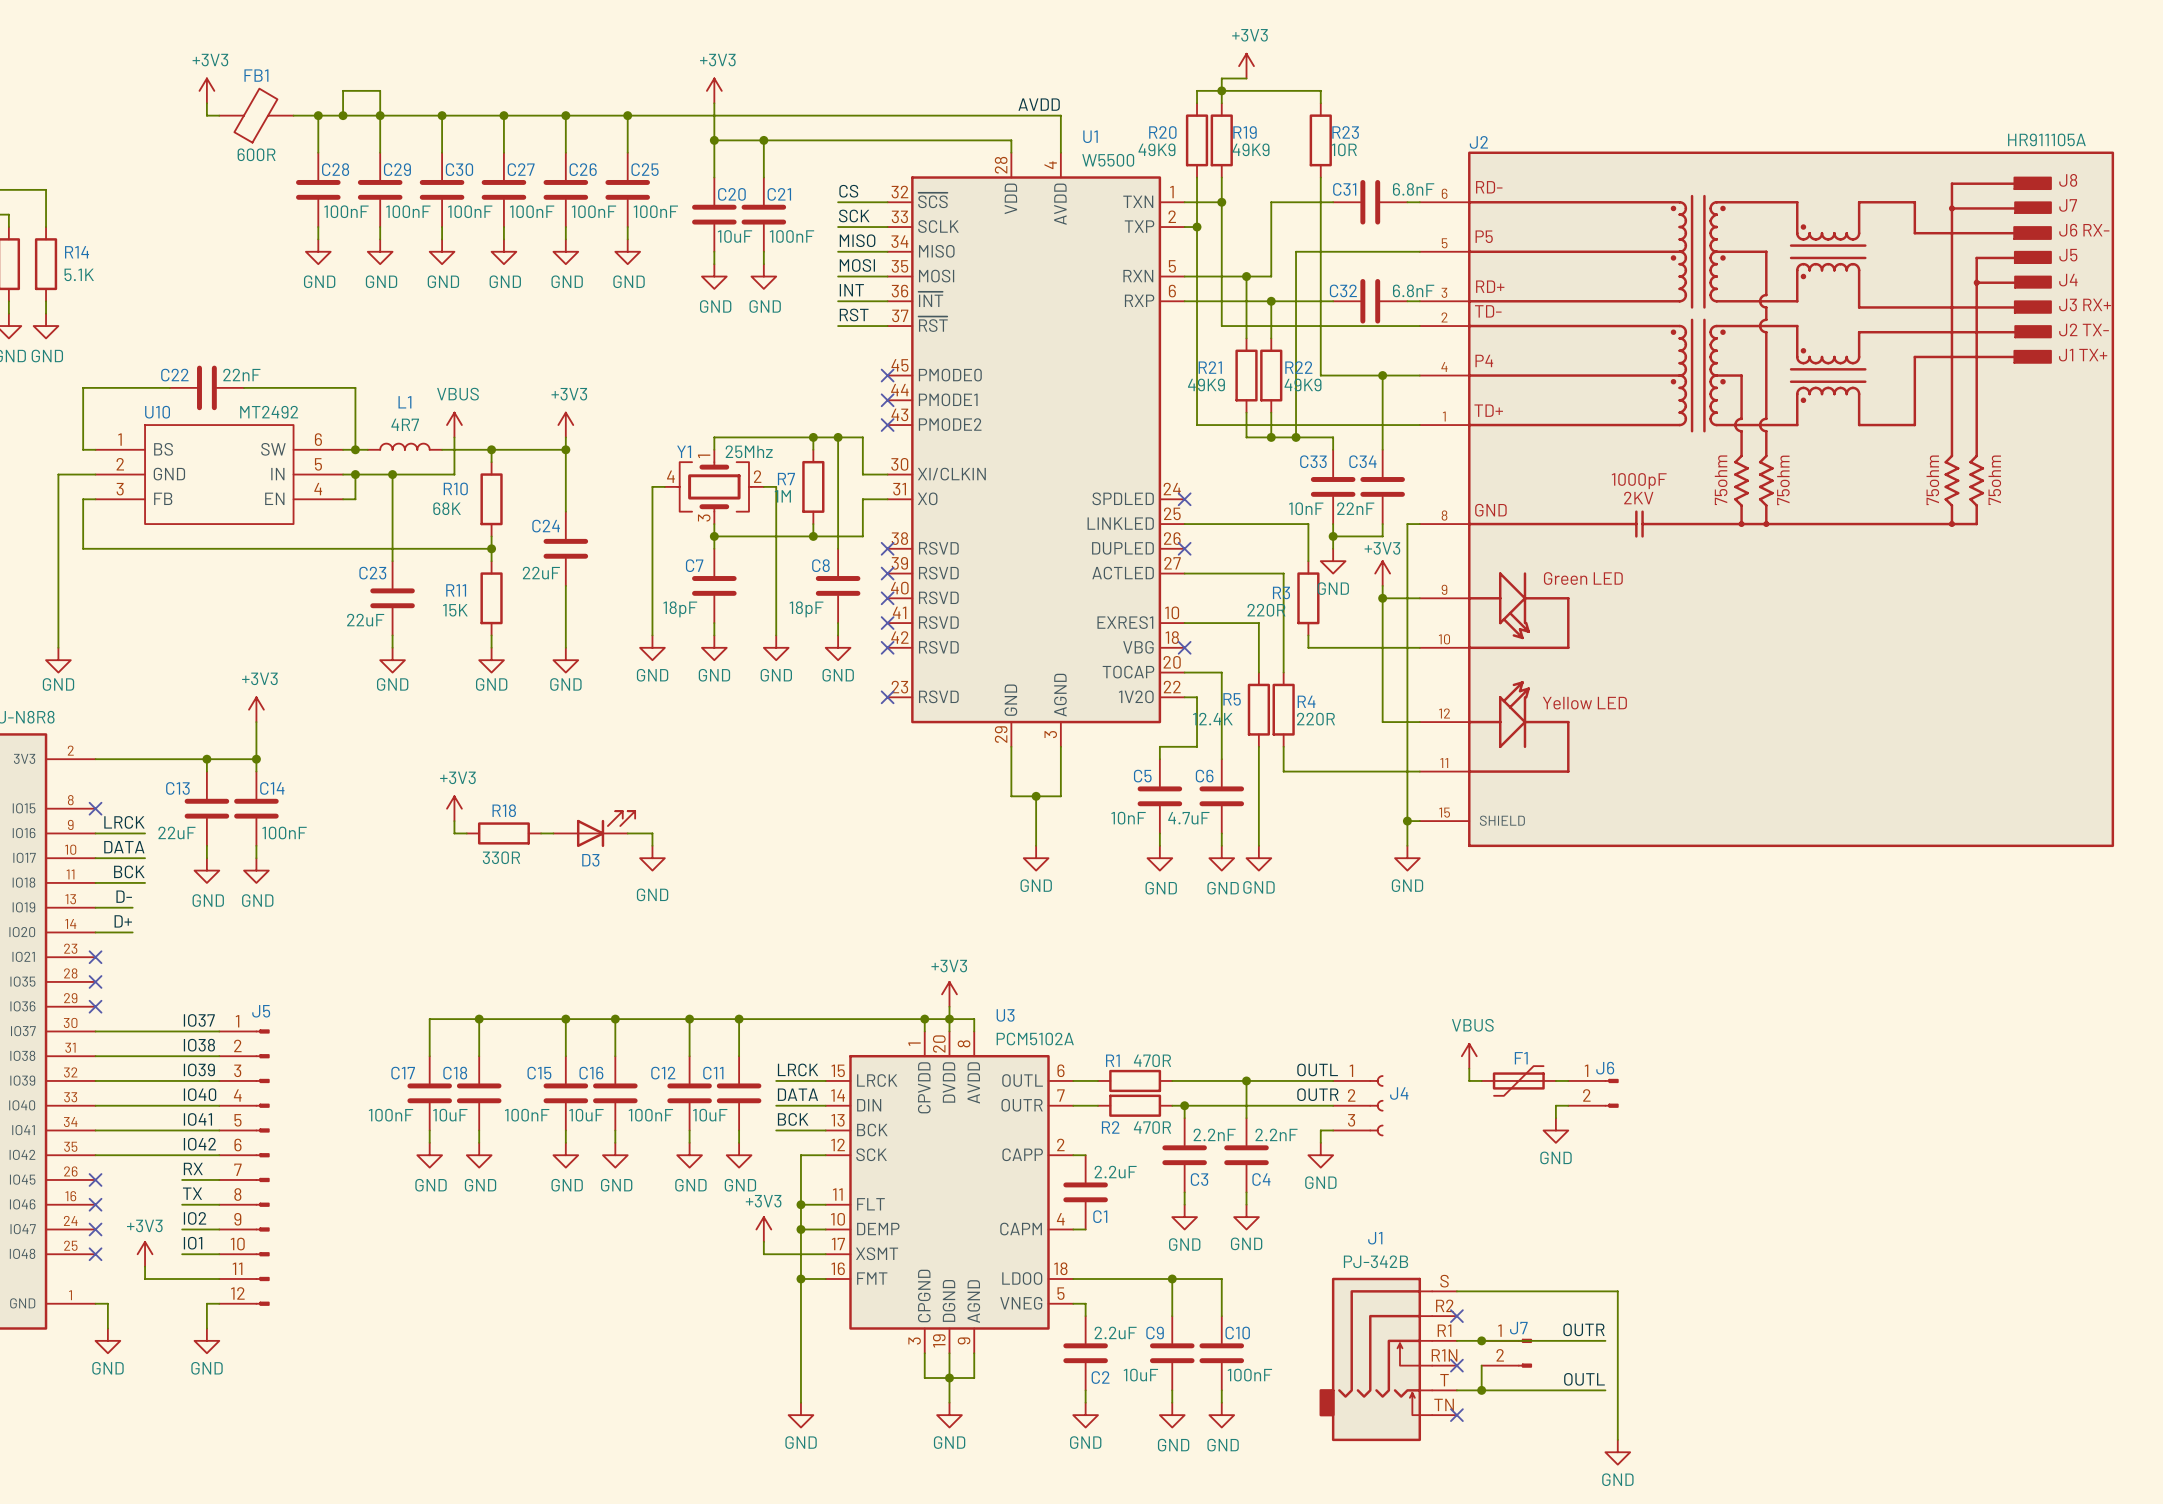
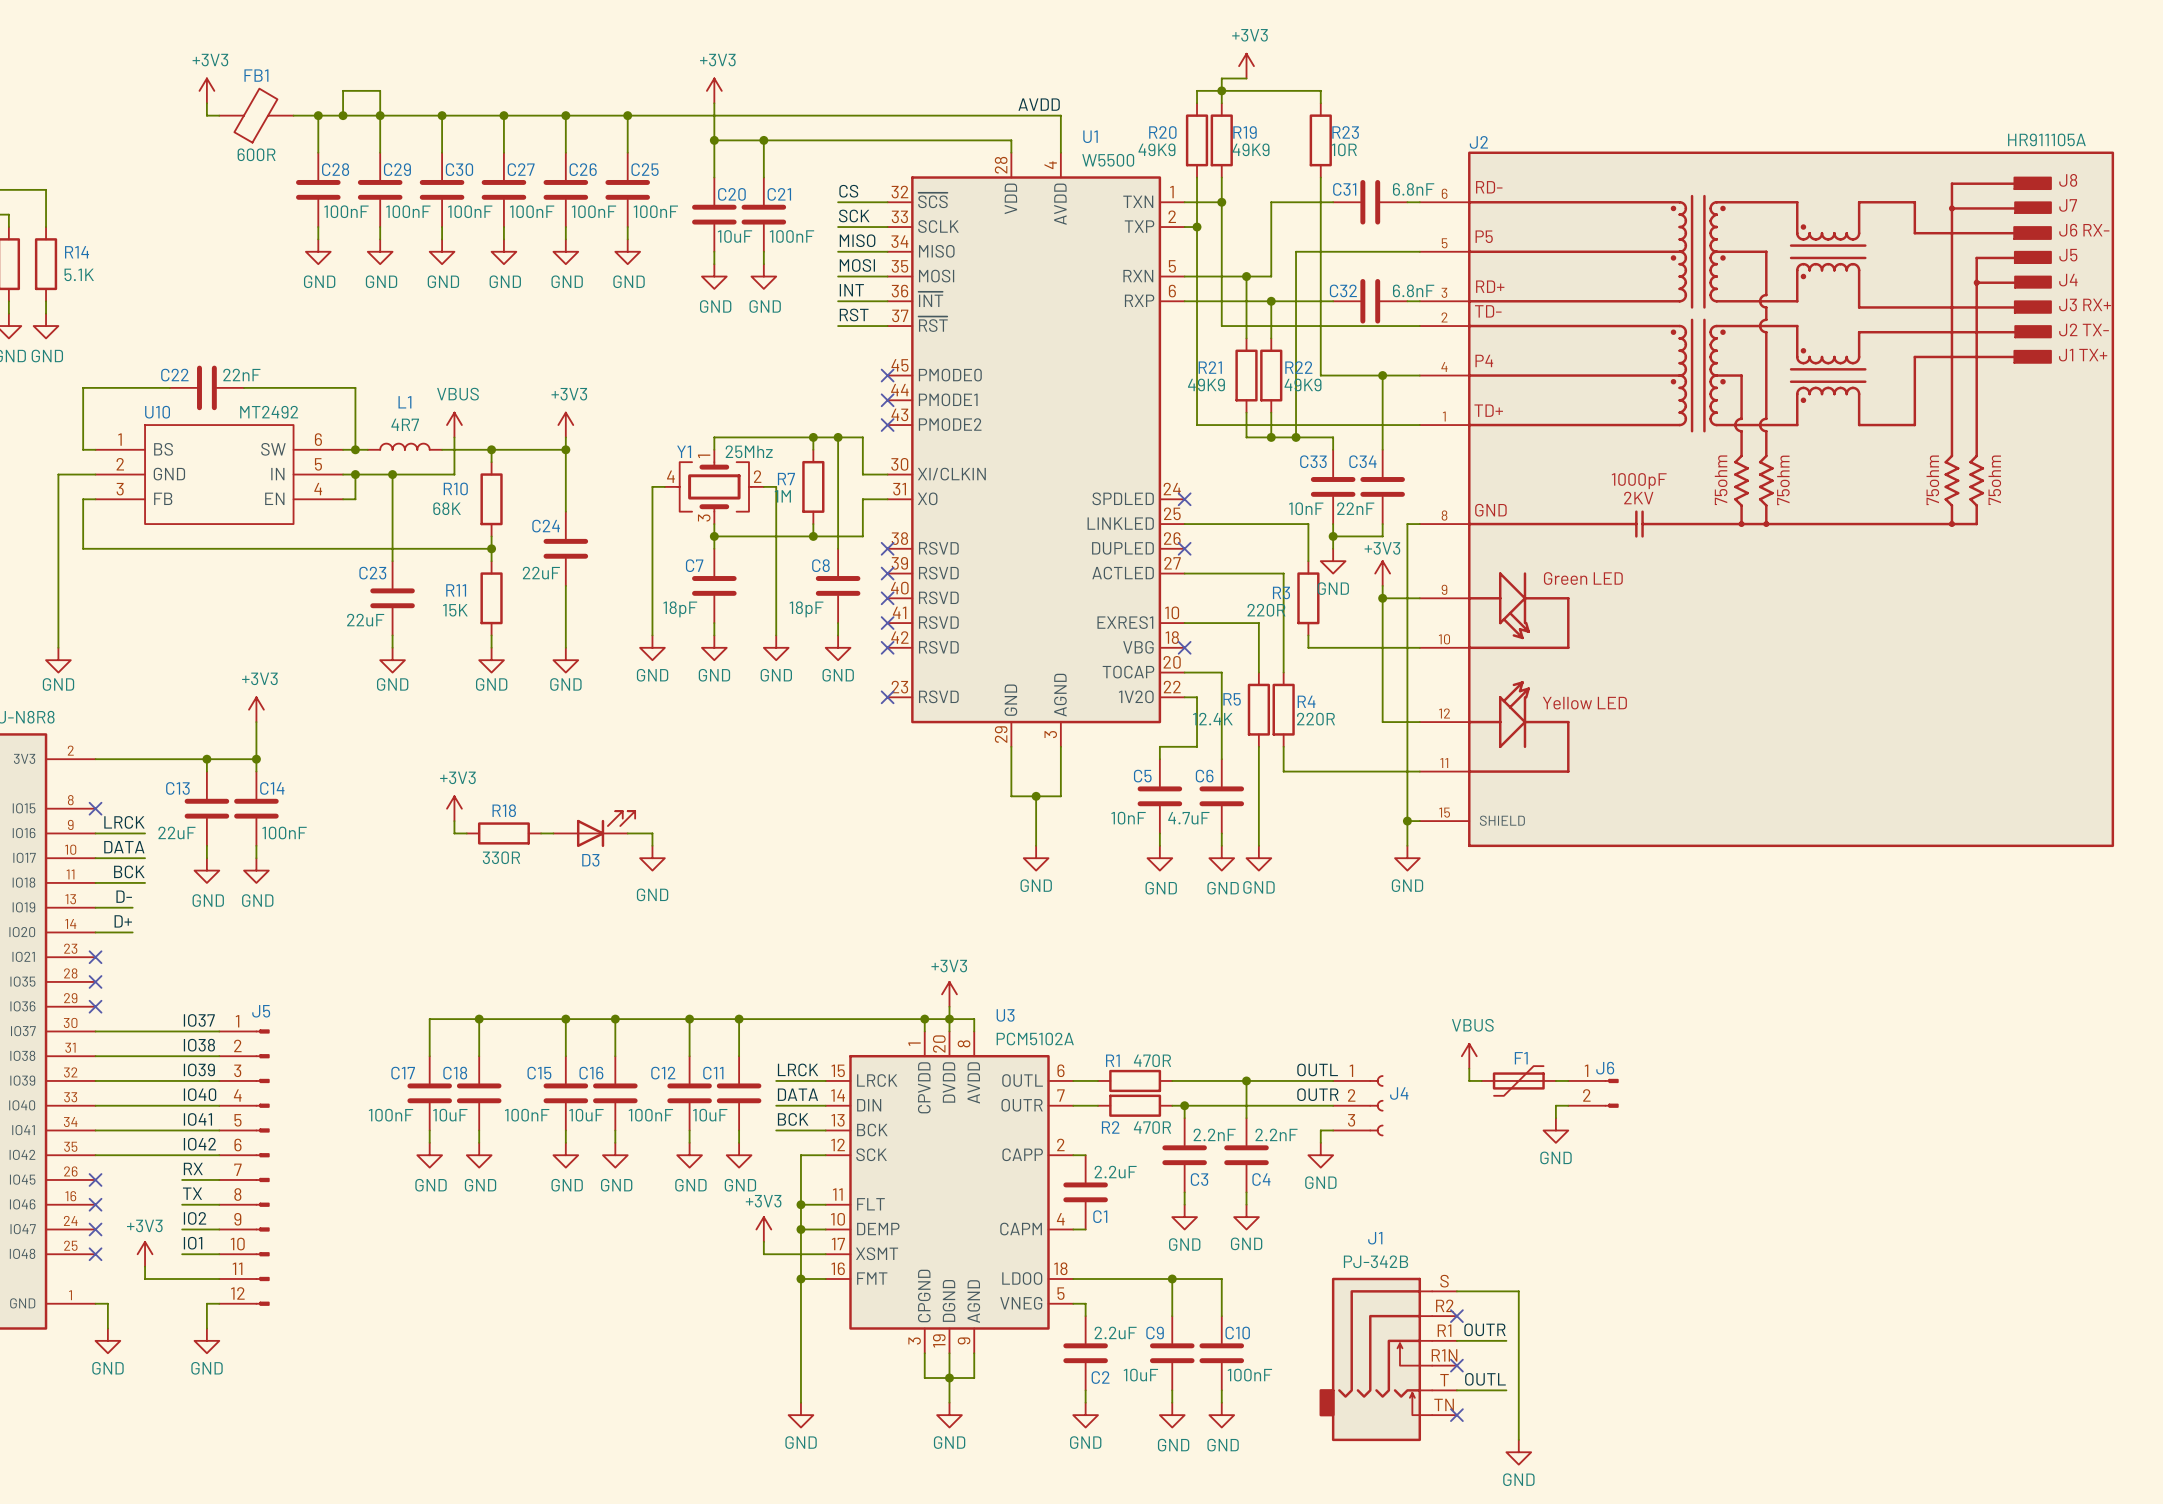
wire: (1518, 1291) (1617, 1291) (1617, 1439) -> (1518, 1291) (1518, 1439)
label position: OUTR (1583, 1329) -> OUTR (1484, 1329)
junction: (1481, 1340) -> none
wire: (1506, 1340) (1605, 1340) -> none
J7: (1506, 1353) -> none
wire: (1481, 1365) (1481, 1390) -> none
label position: OUTL (1584, 1379) -> OUTL (1485, 1379)
junction: (1481, 1390) -> none
wire: (1506, 1390) (1605, 1390) -> none
power symbol position: GND (1617, 1452) -> GND (1518, 1452)

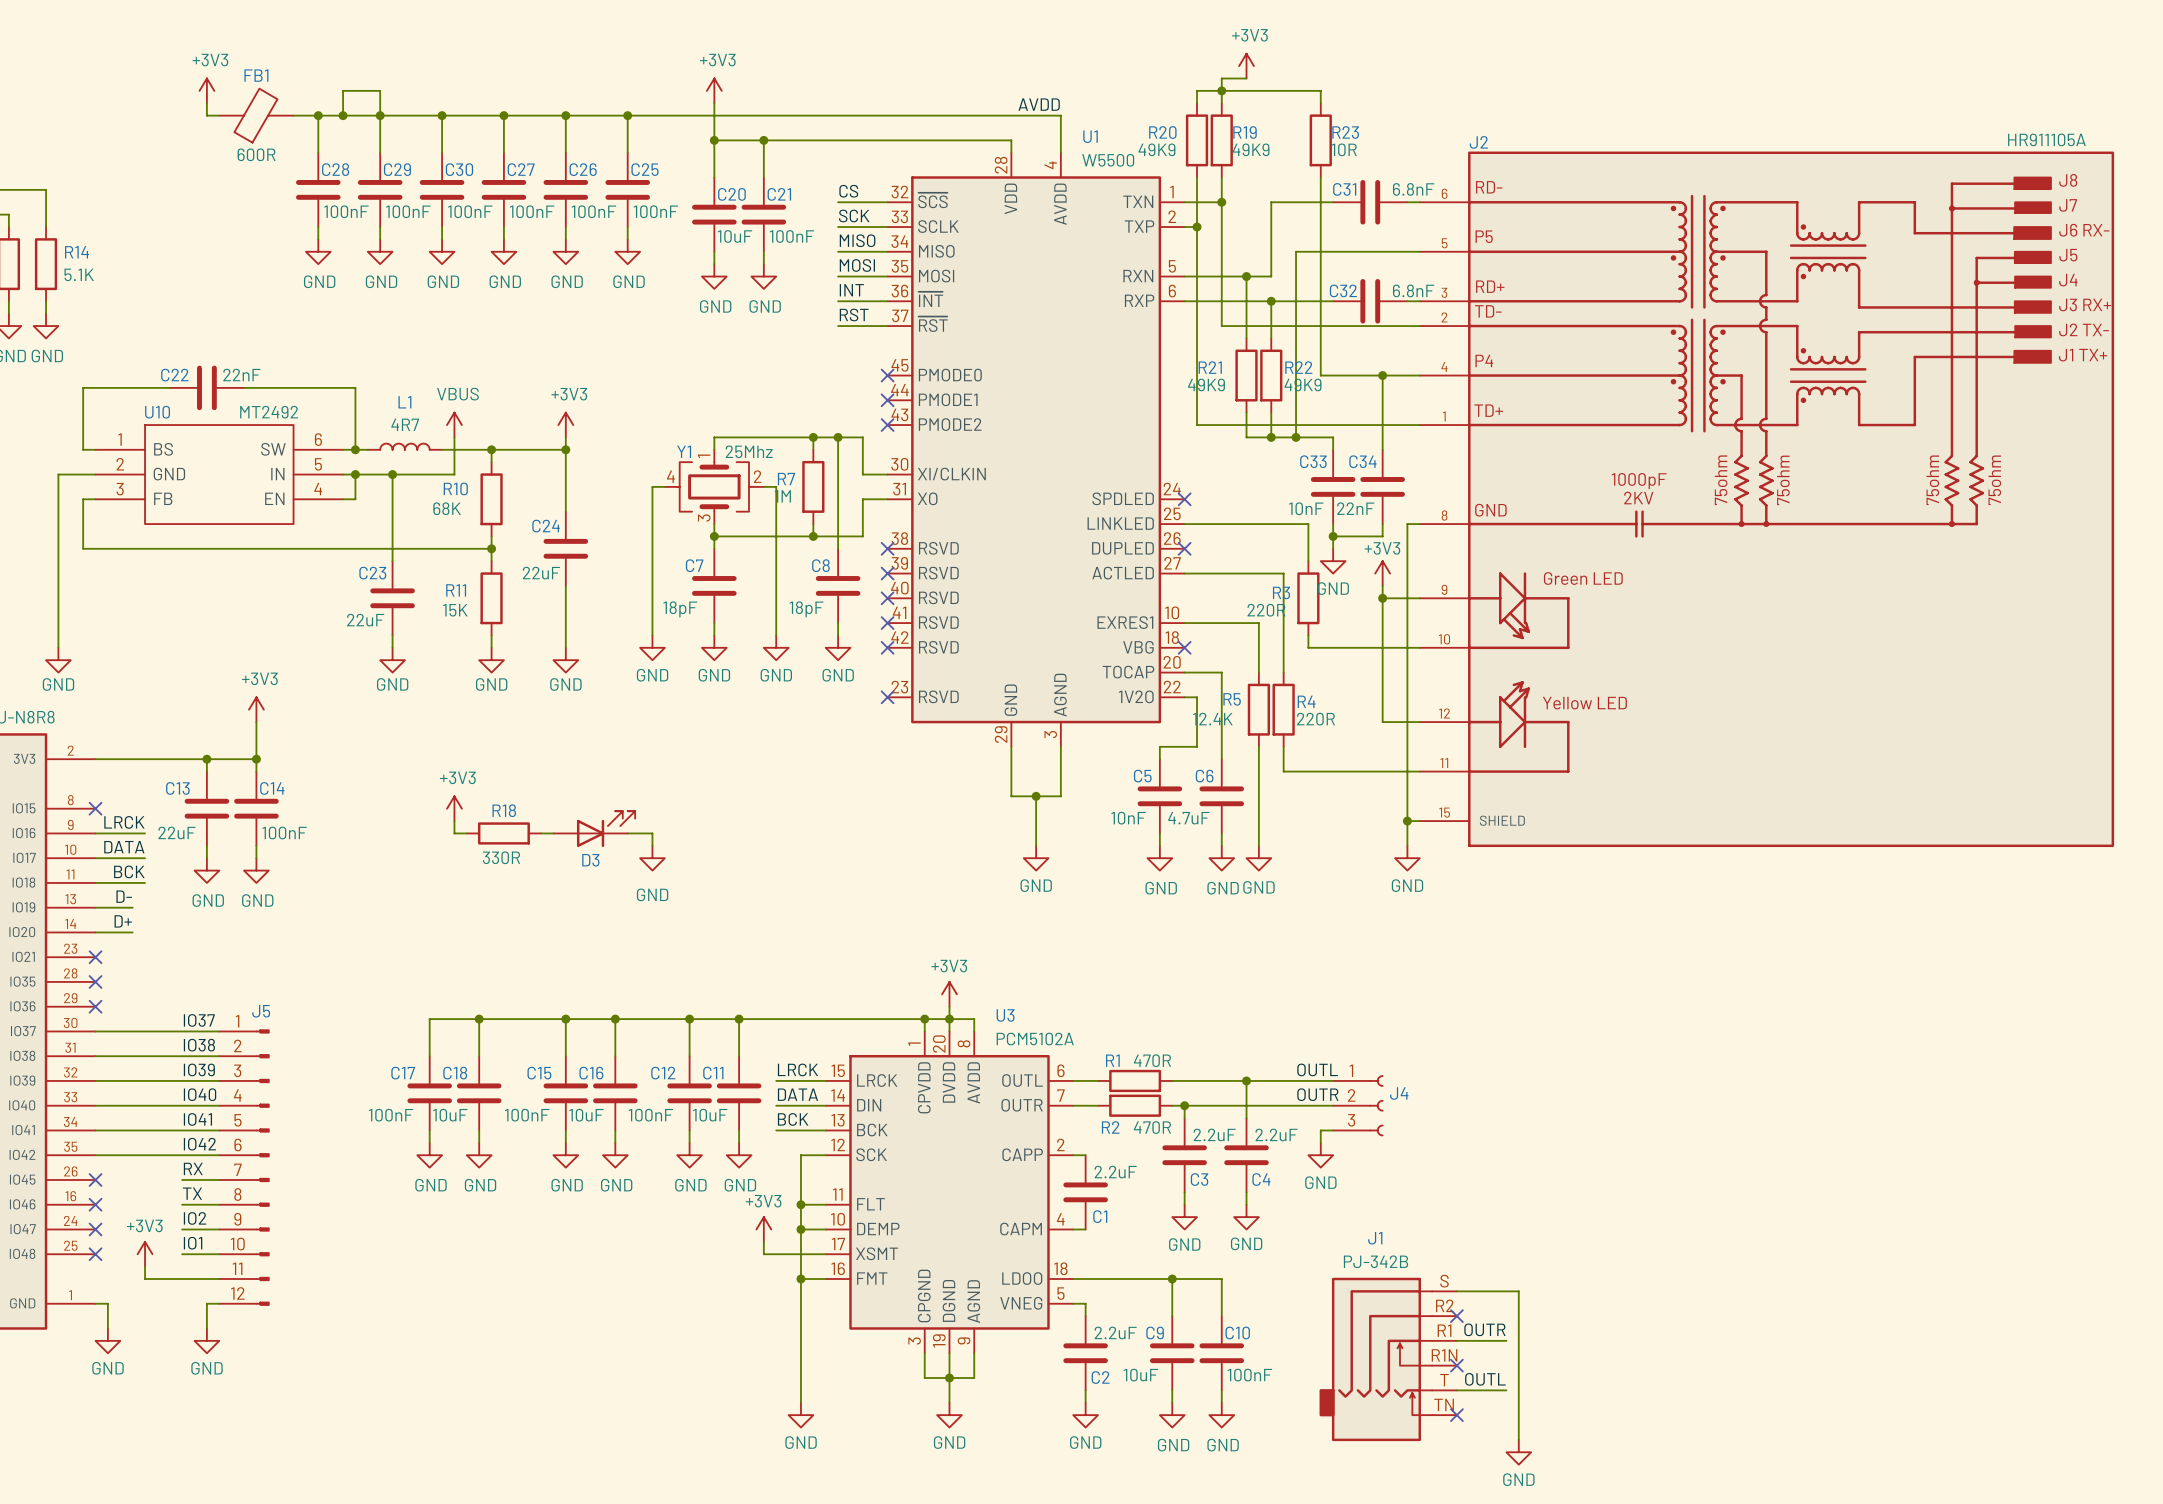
power symbol: VBUS (1469, 1056) -> none
wire: (1469, 1068) (1469, 1080) (1481, 1080) -> none
F1: (1518, 1080) -> none
wire: (1555, 1080) (1568, 1080) -> none
J6: (1593, 1093) -> none
wire: (1568, 1105) (1555, 1105) (1555, 1118) -> none
power symbol: GND (1555, 1130) -> none
C3 value: 2.2nF (1214, 1134) -> 2.2uF (1214, 1134)
C4 value: 2.2nF (1276, 1134) -> 2.2uF (1276, 1134)

